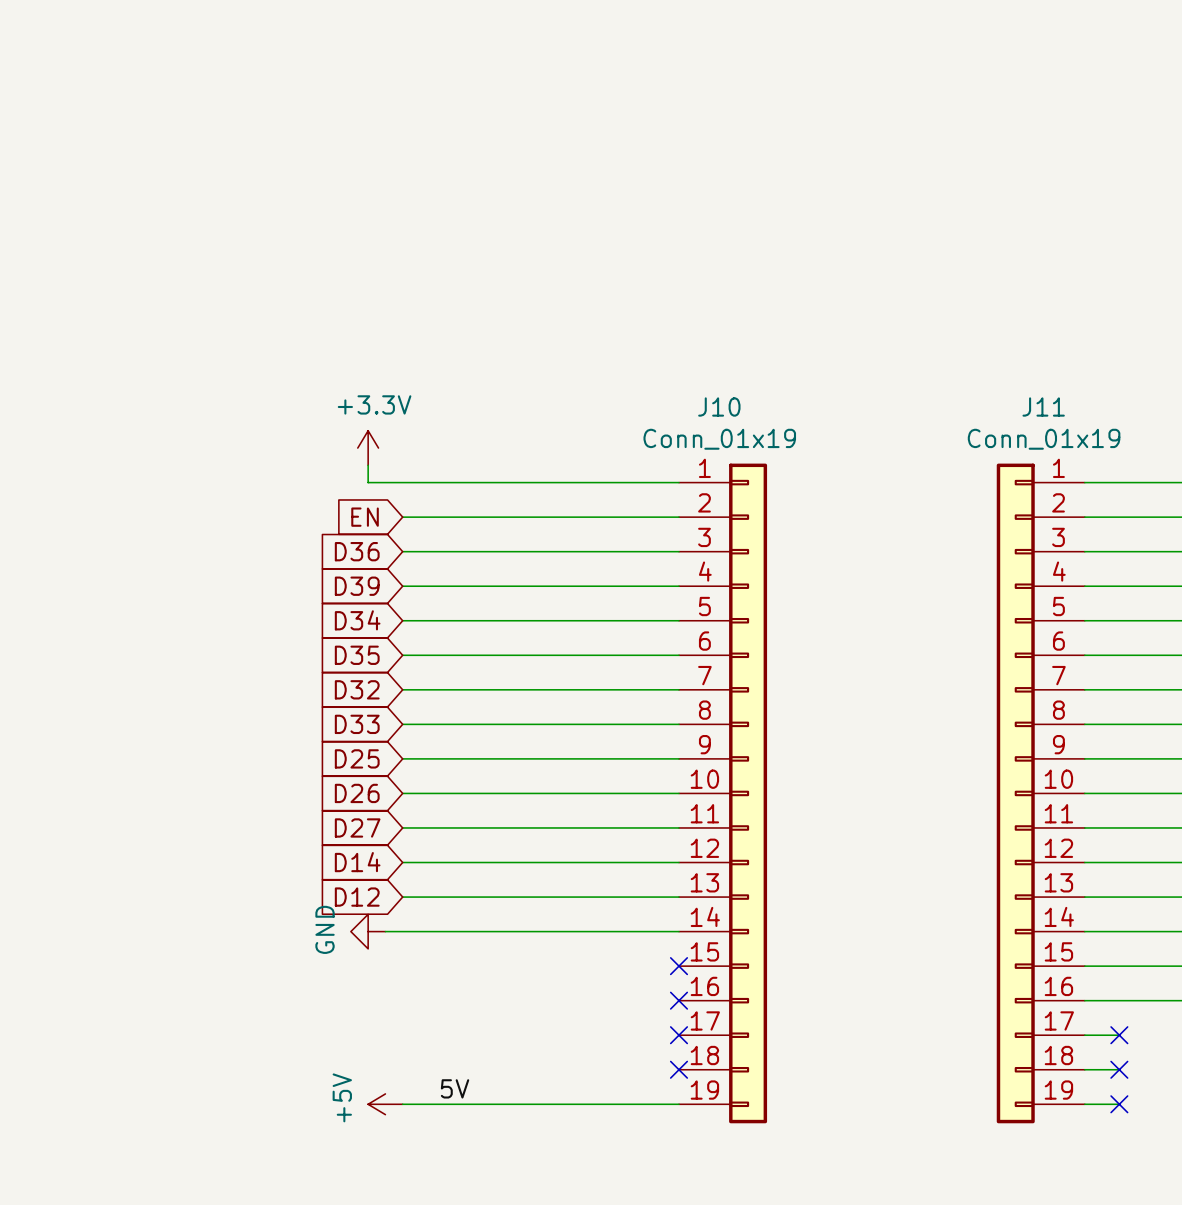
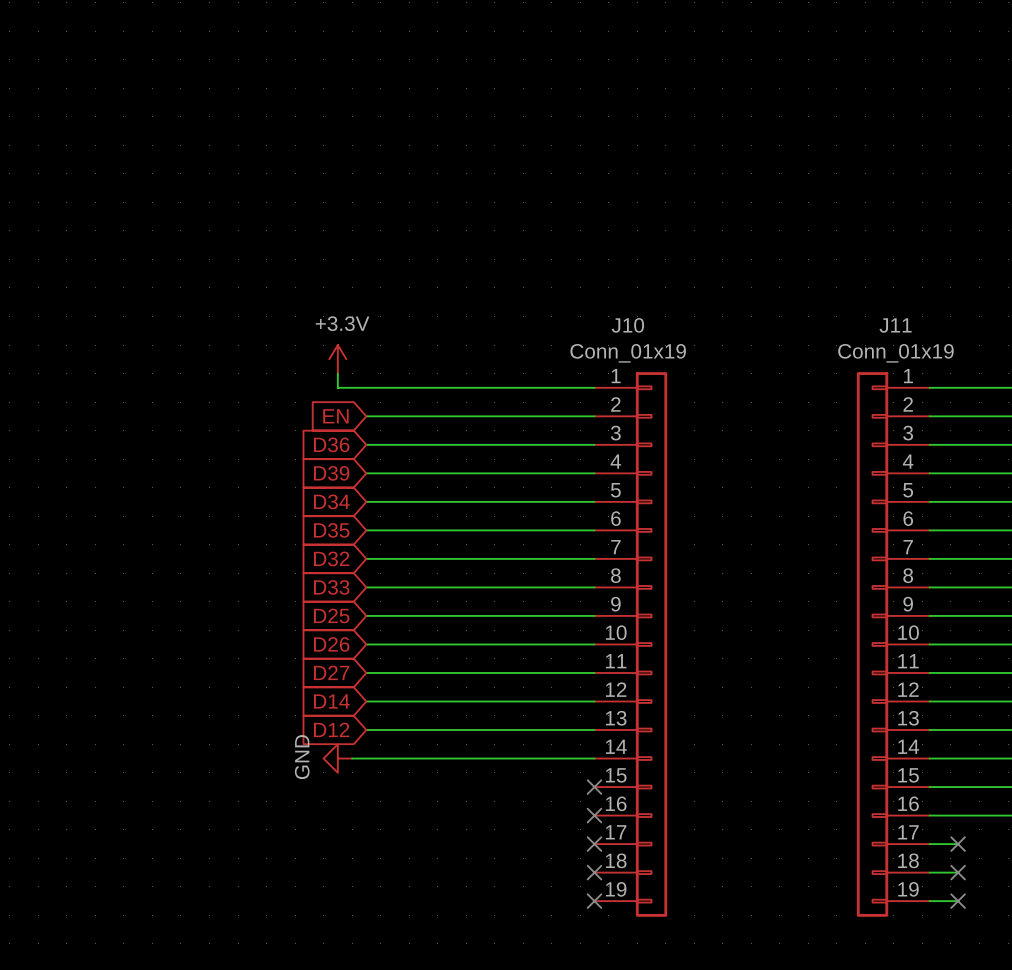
label: 5V (455, 1088) -> none
power symbol: +5V (385, 1104) -> none
wire: (402, 1104) (678, 1104) -> none
no-connect mark: none -> (594, 901)

